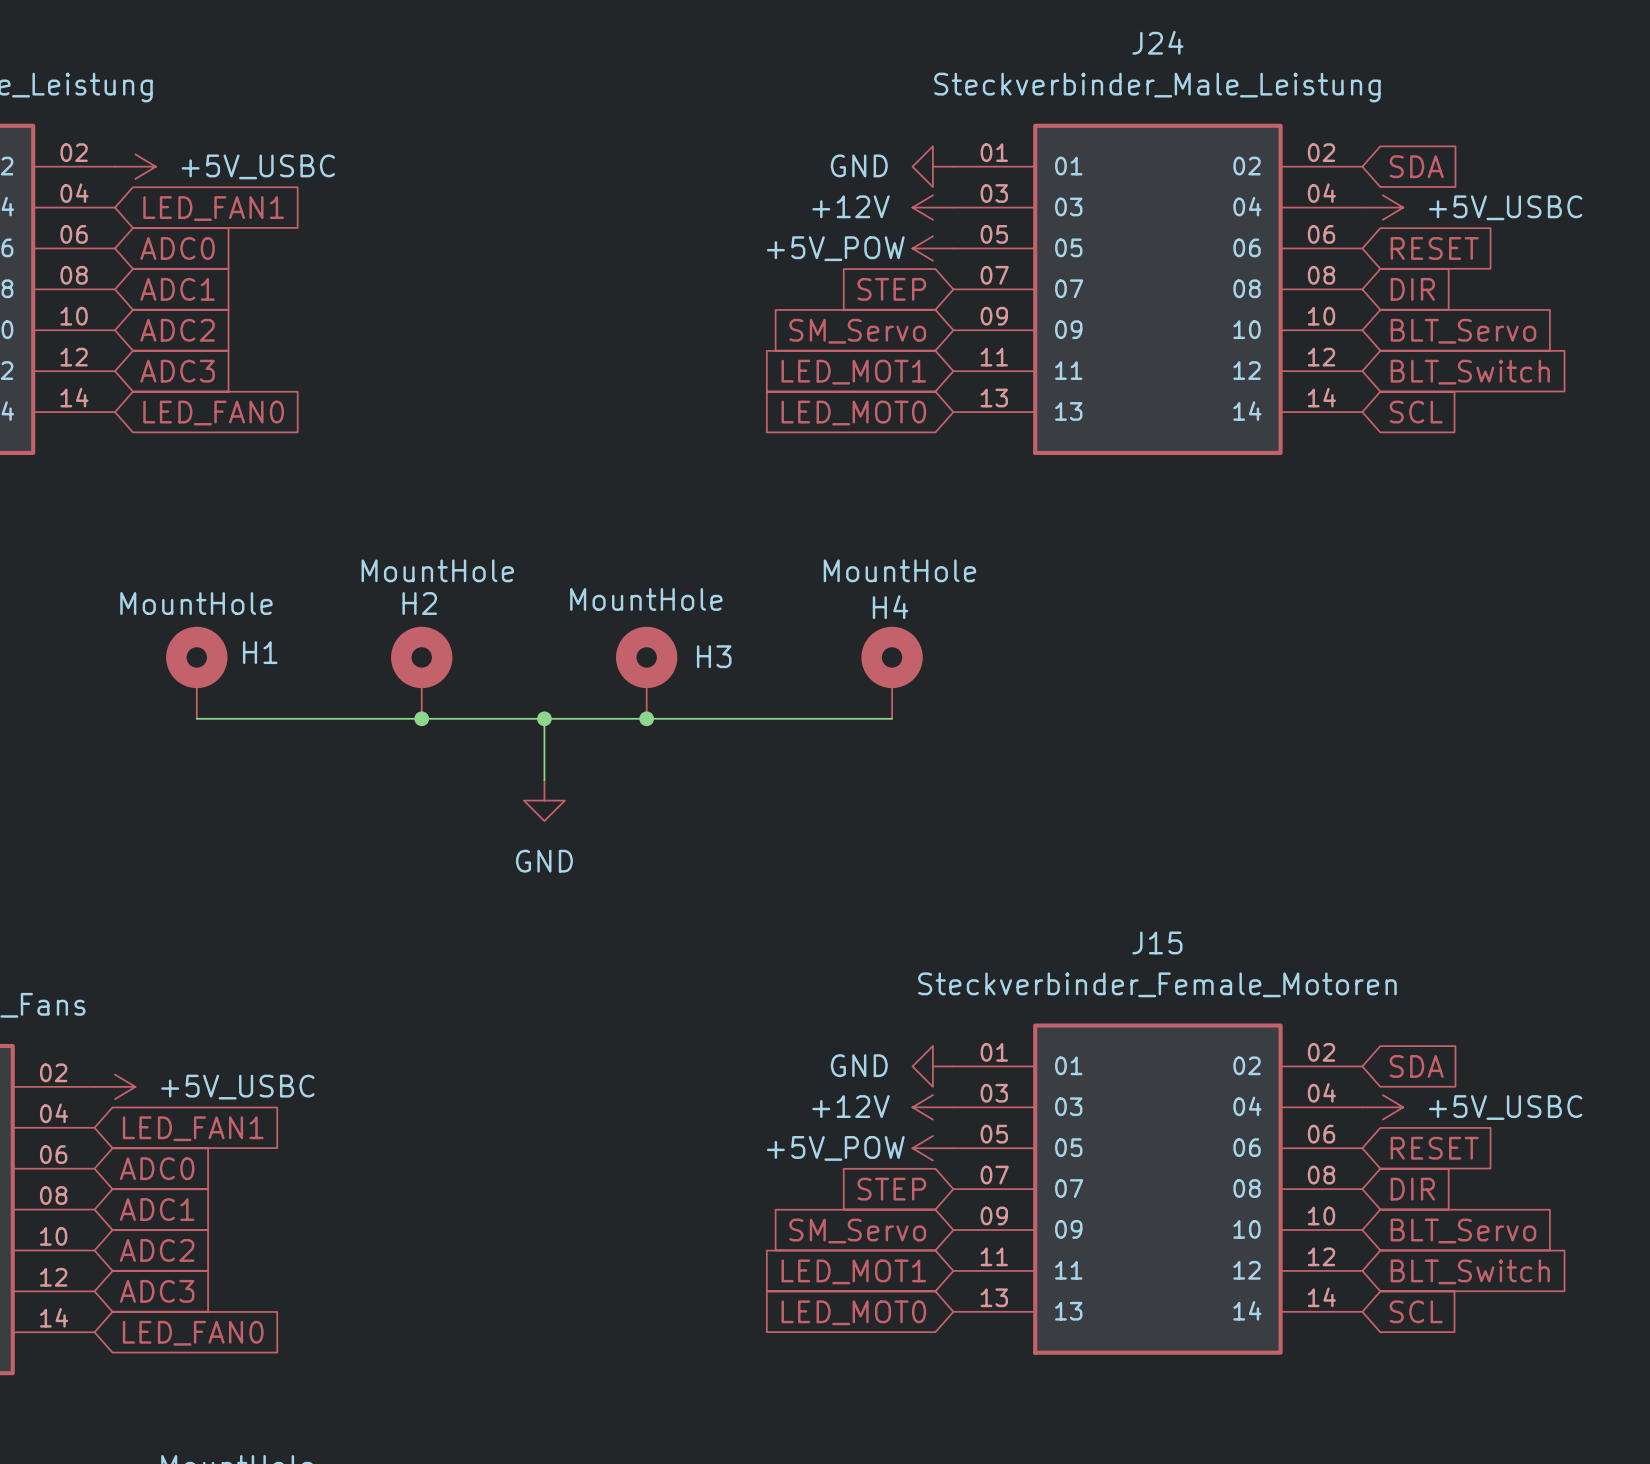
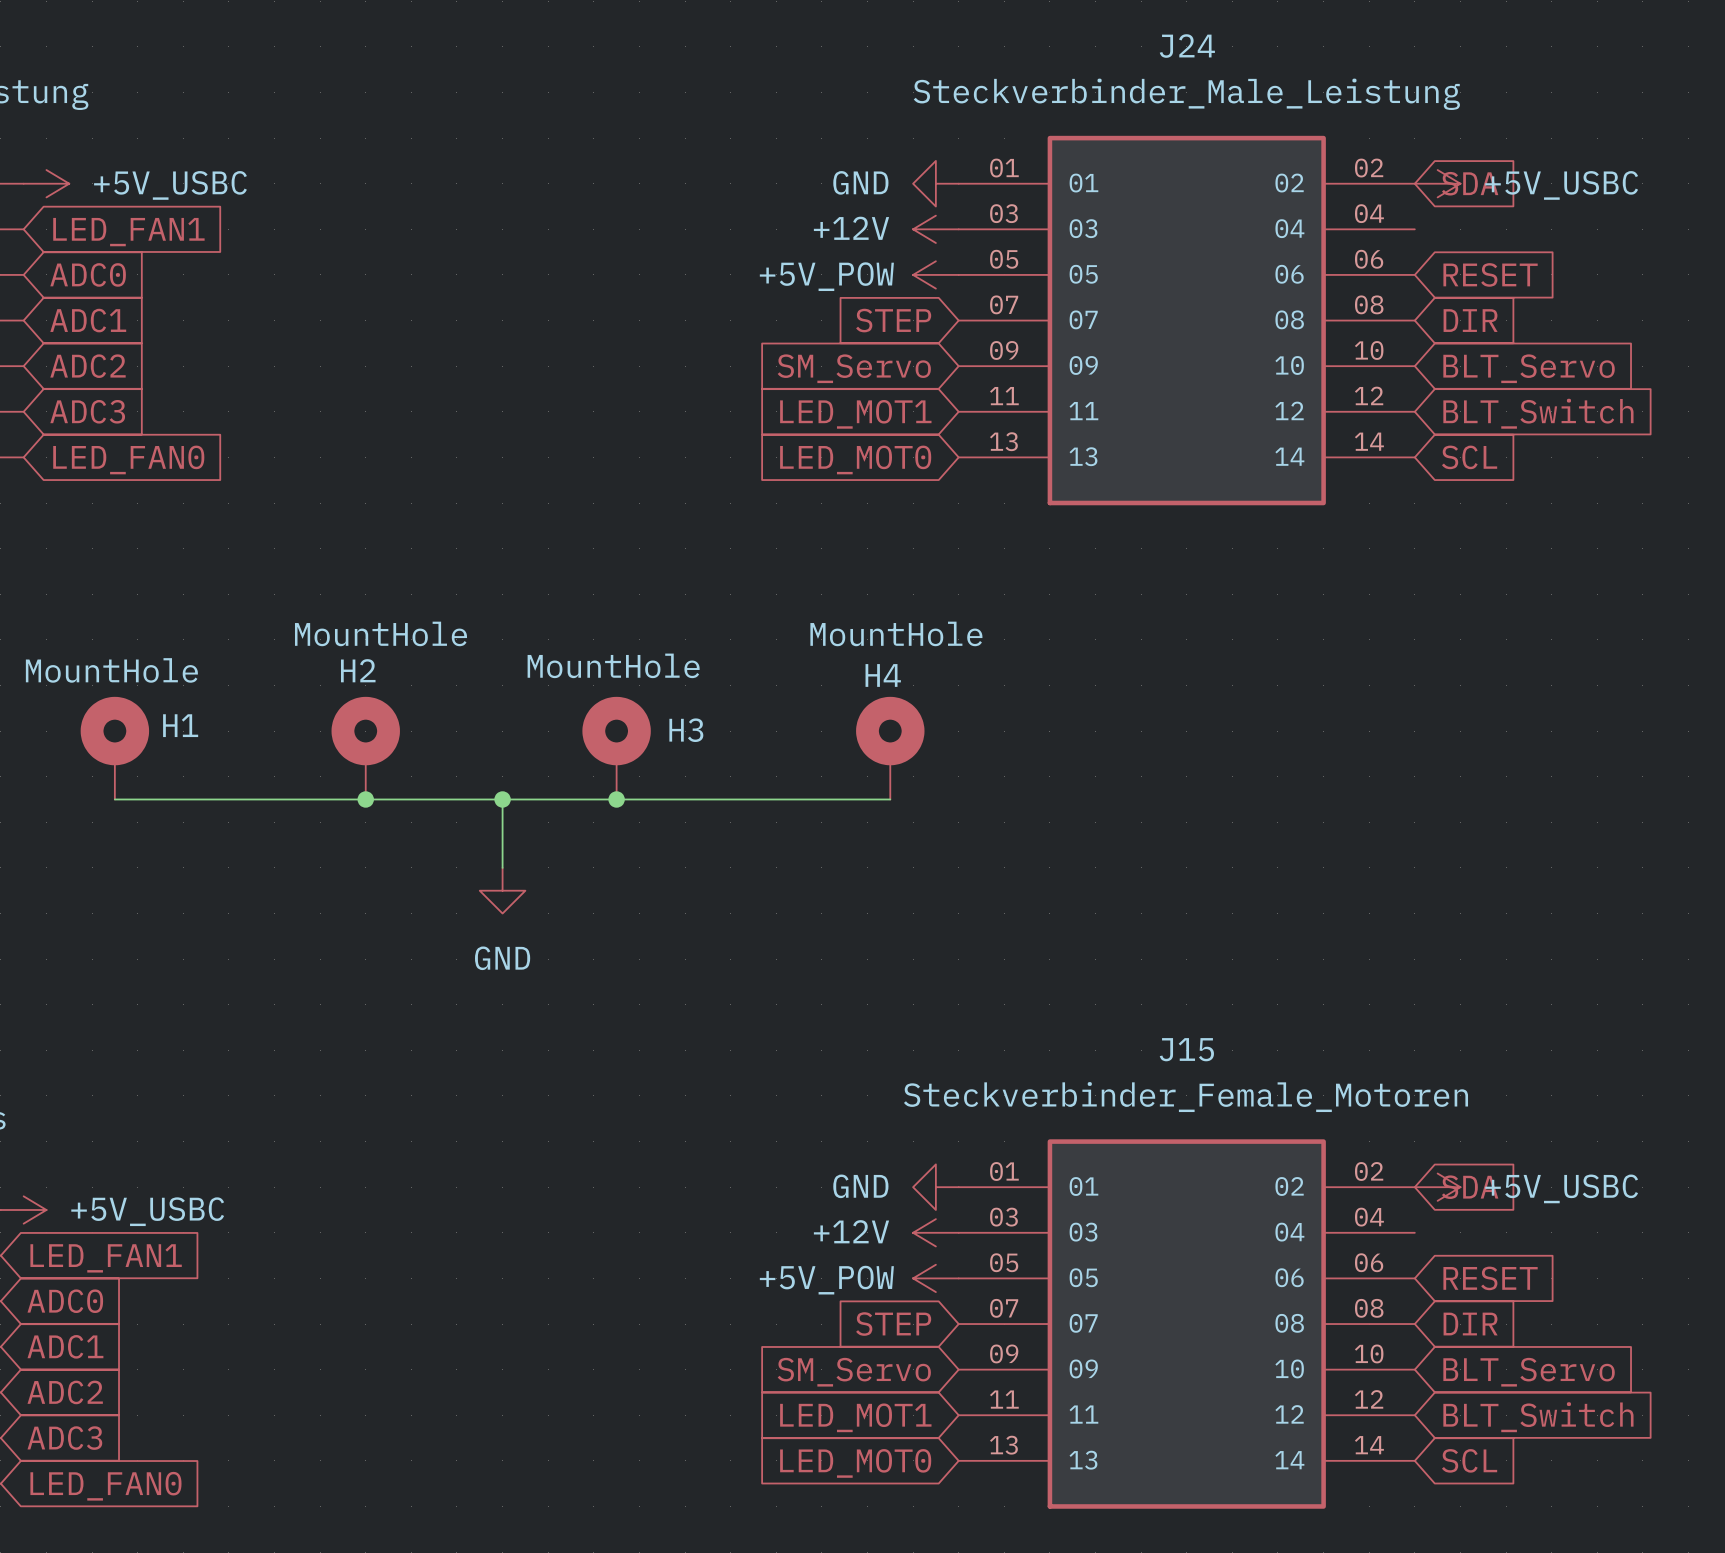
power symbol position: +5V_USBC (1382, 207) -> +5V_USBC (1437, 183)
power symbol position: +5V_USBC (1382, 1107) -> +5V_USBC (1437, 1187)

